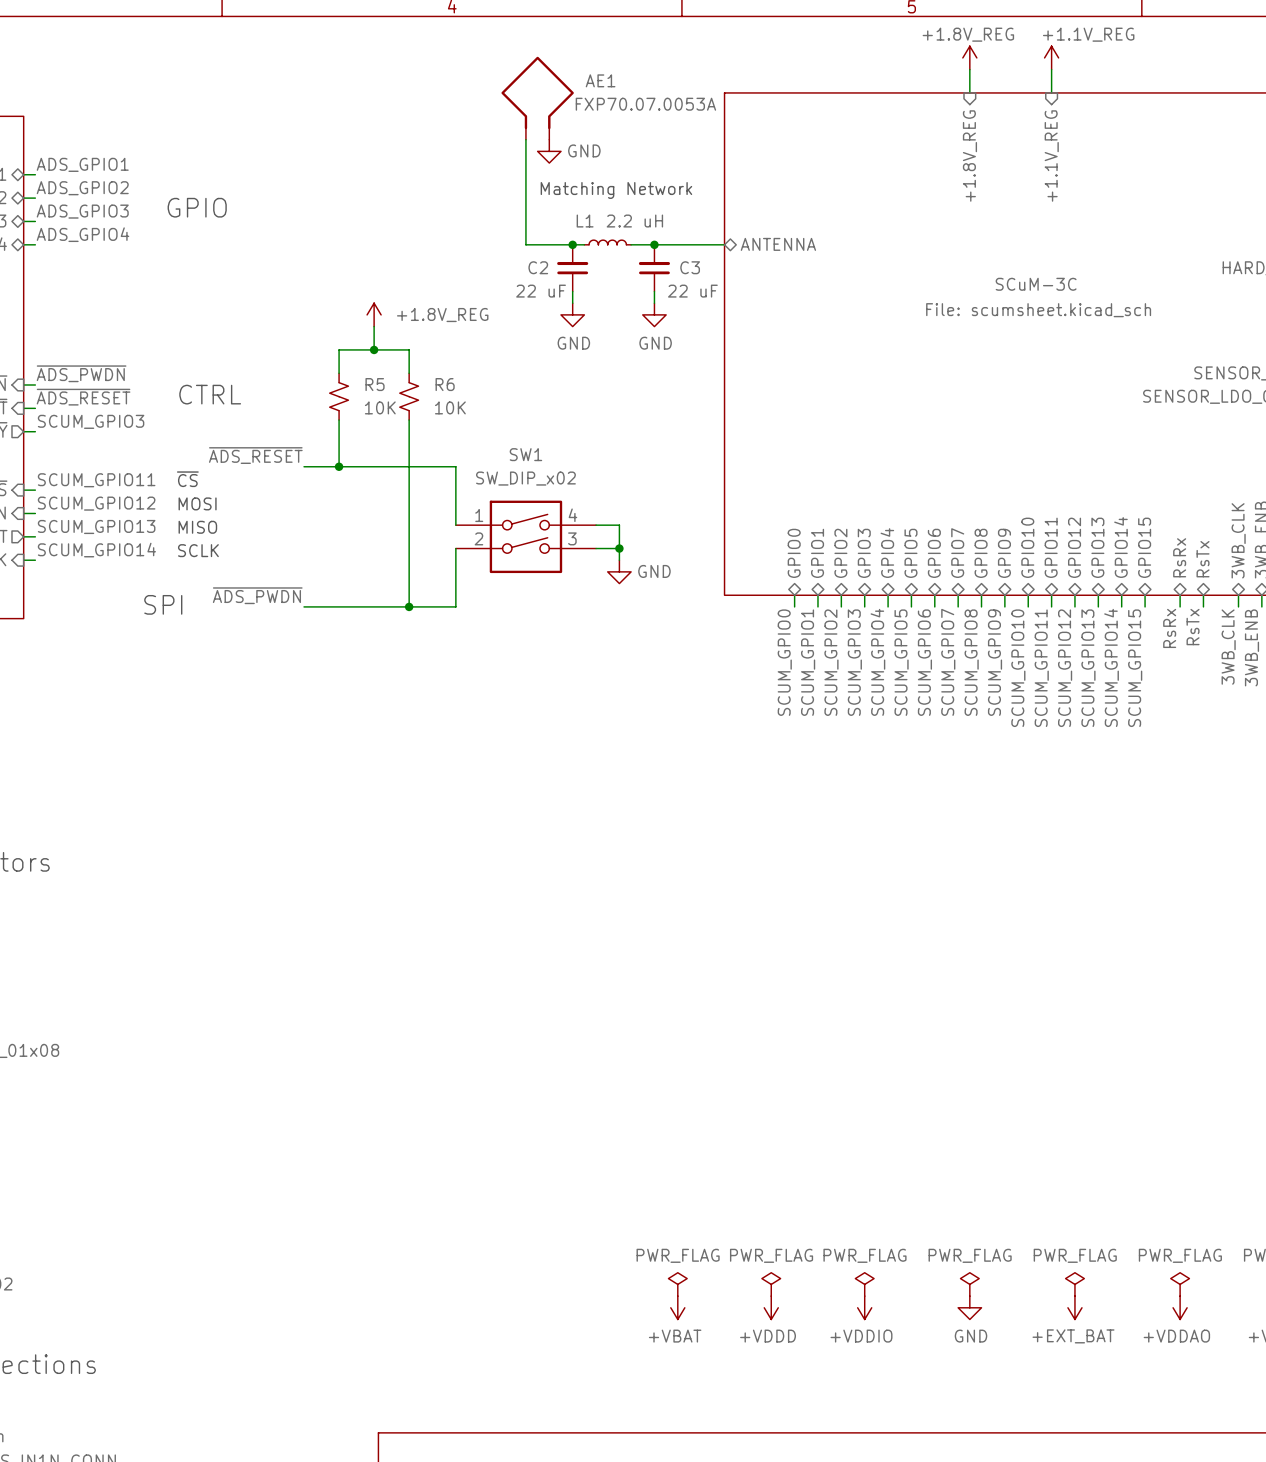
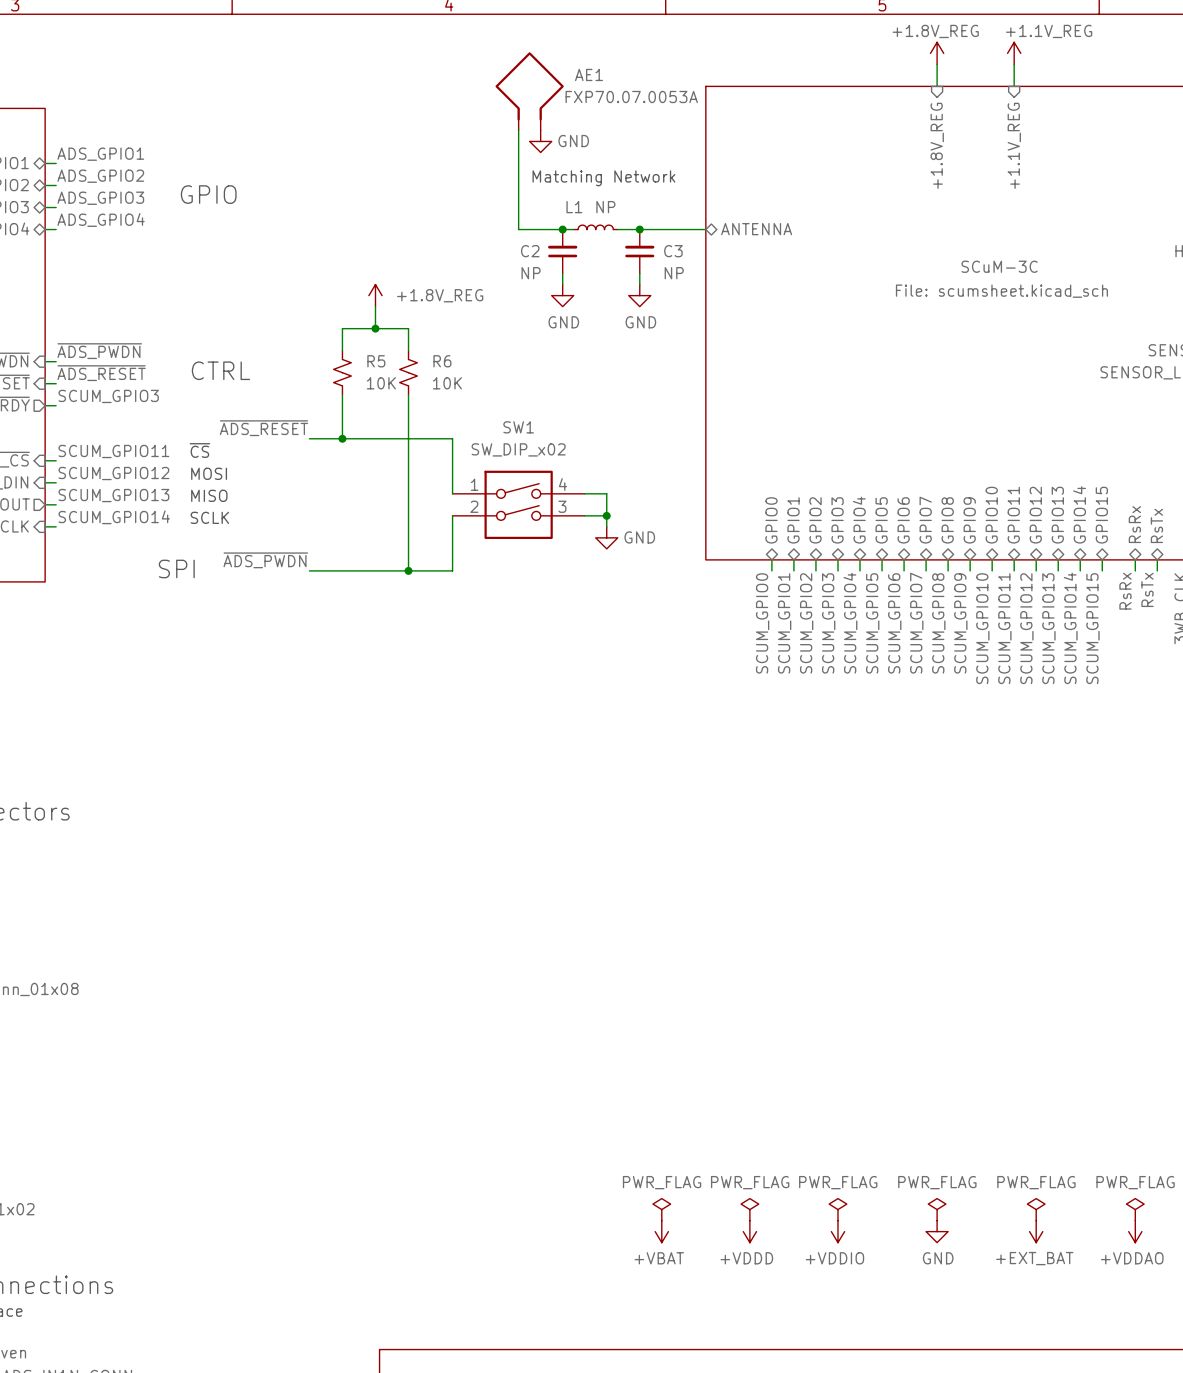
L1 value: 2.2 uH (634, 221) -> NP (605, 207)
C2 value: 22 uF (541, 291) -> NP (531, 273)
C3 value: 22 uF (692, 291) -> NP (674, 273)

